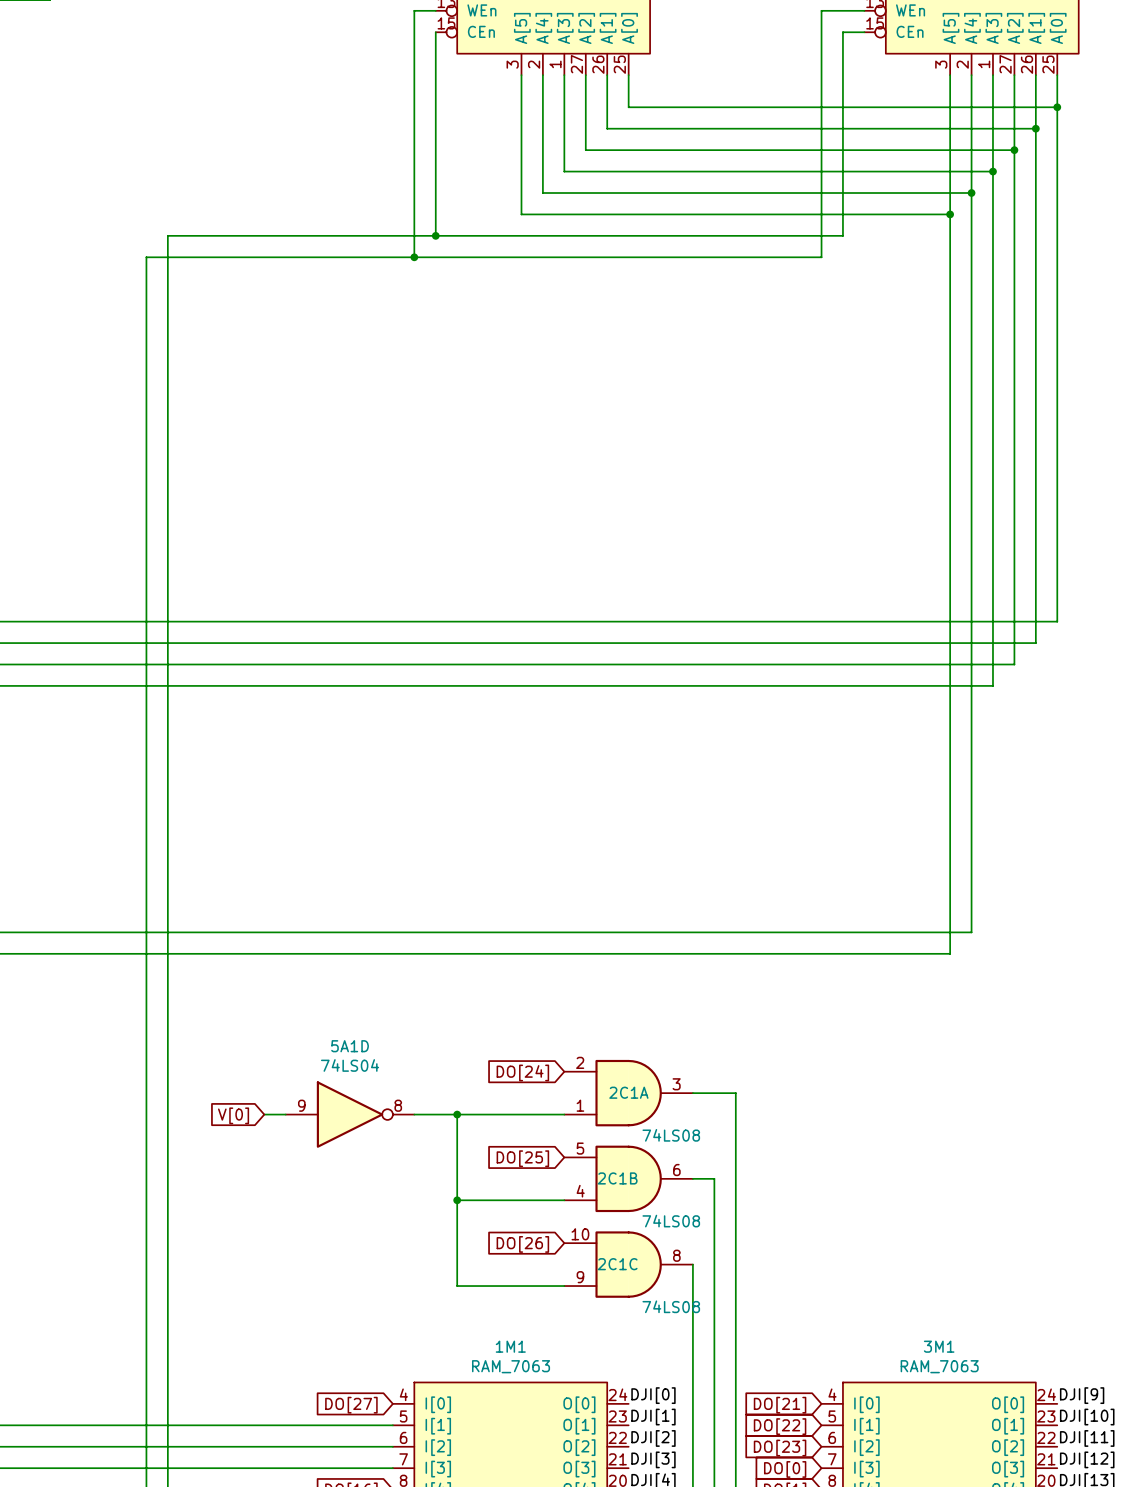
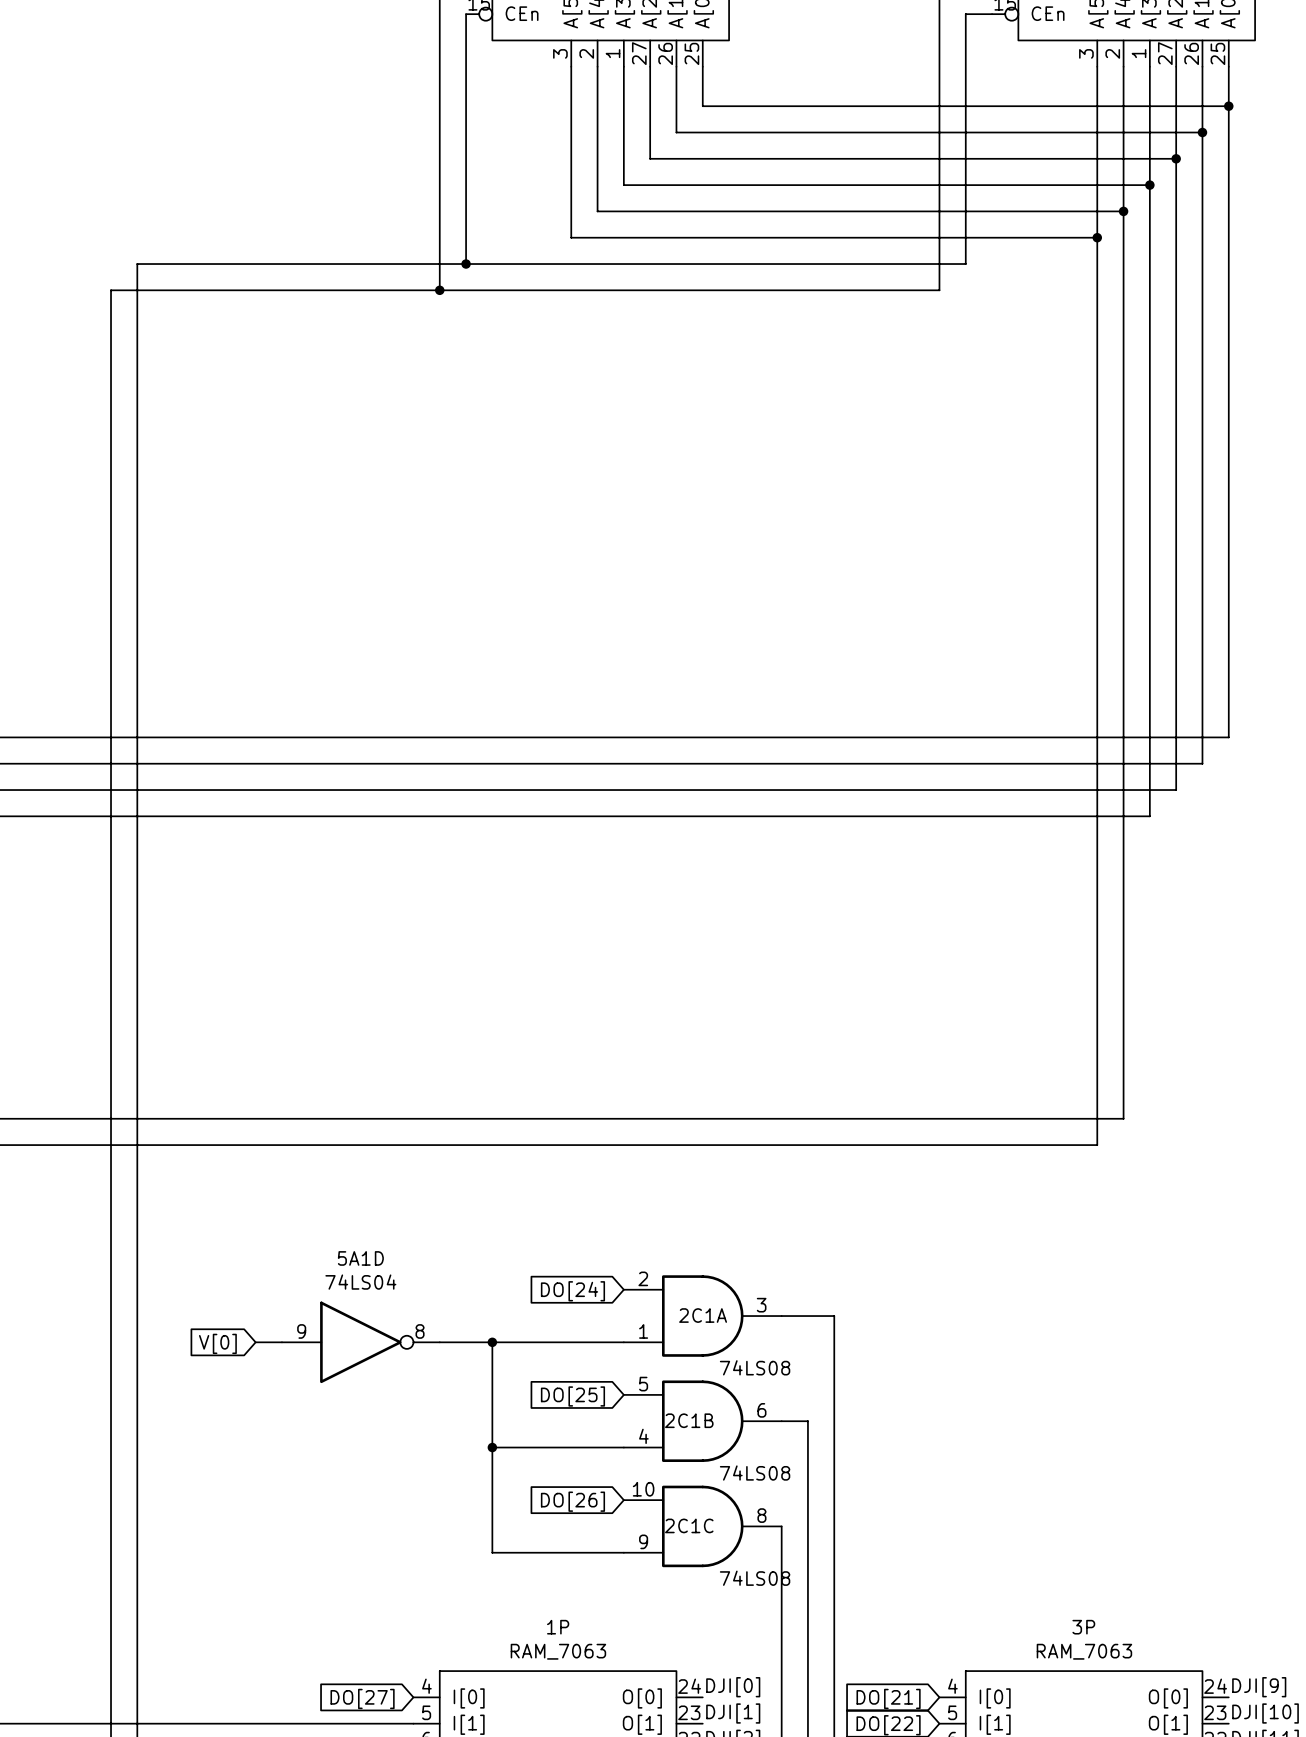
1M1 name: 1M1 (510, 1346) -> 1P (558, 1627)
3M1 name: 3M1 (939, 1346) -> 3P (1083, 1627)

